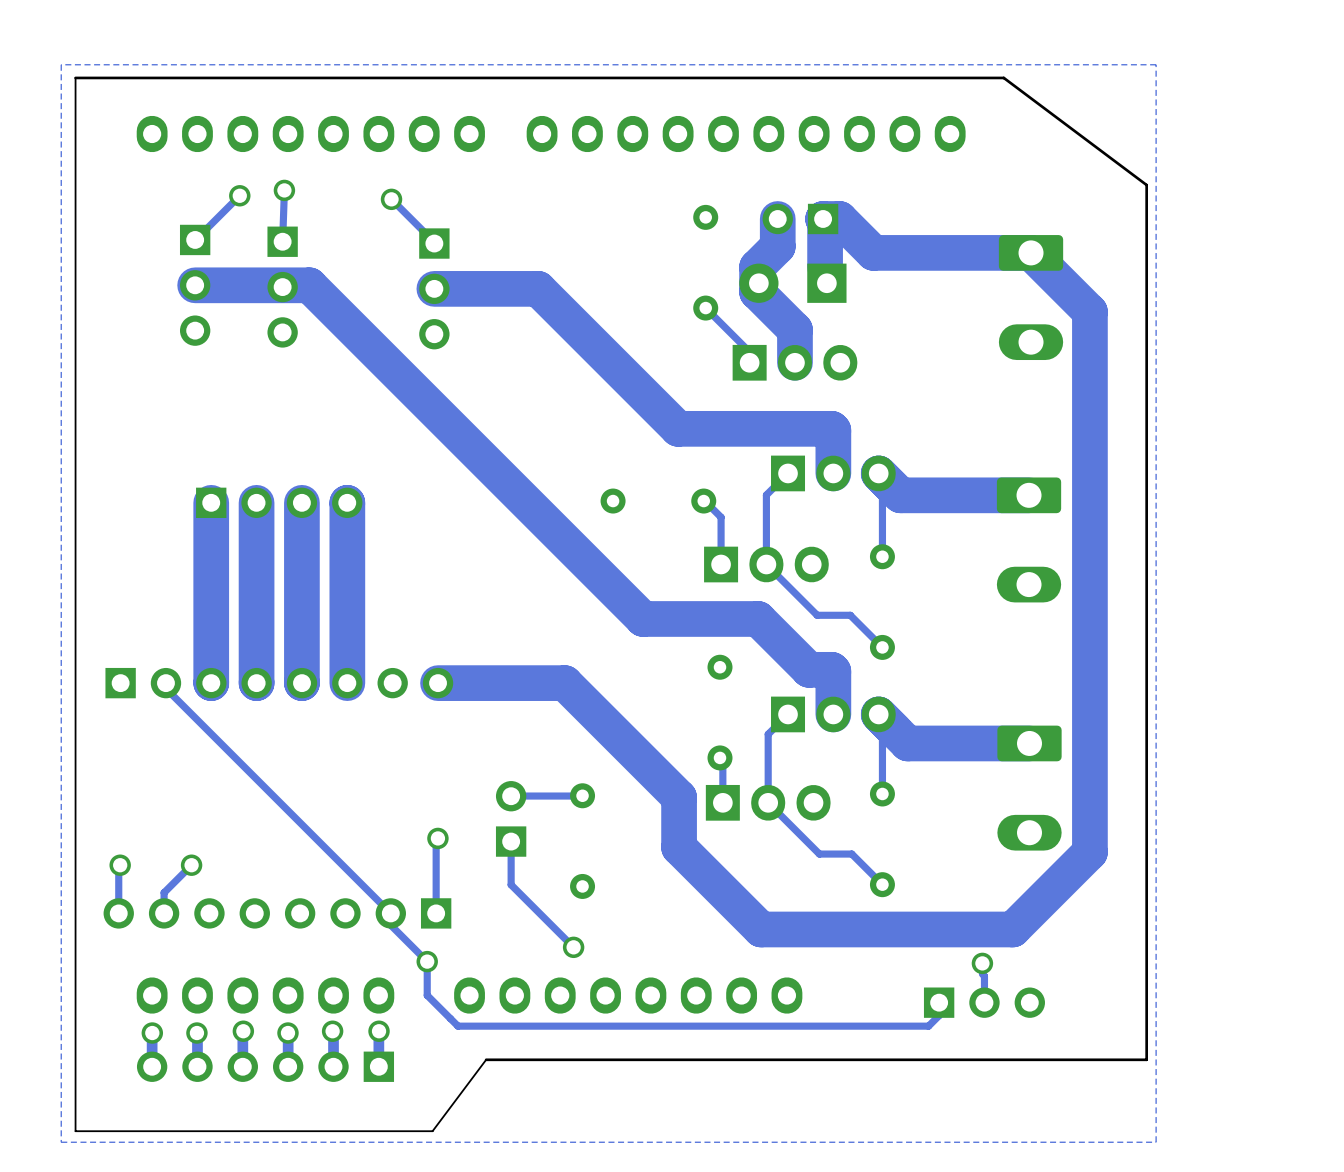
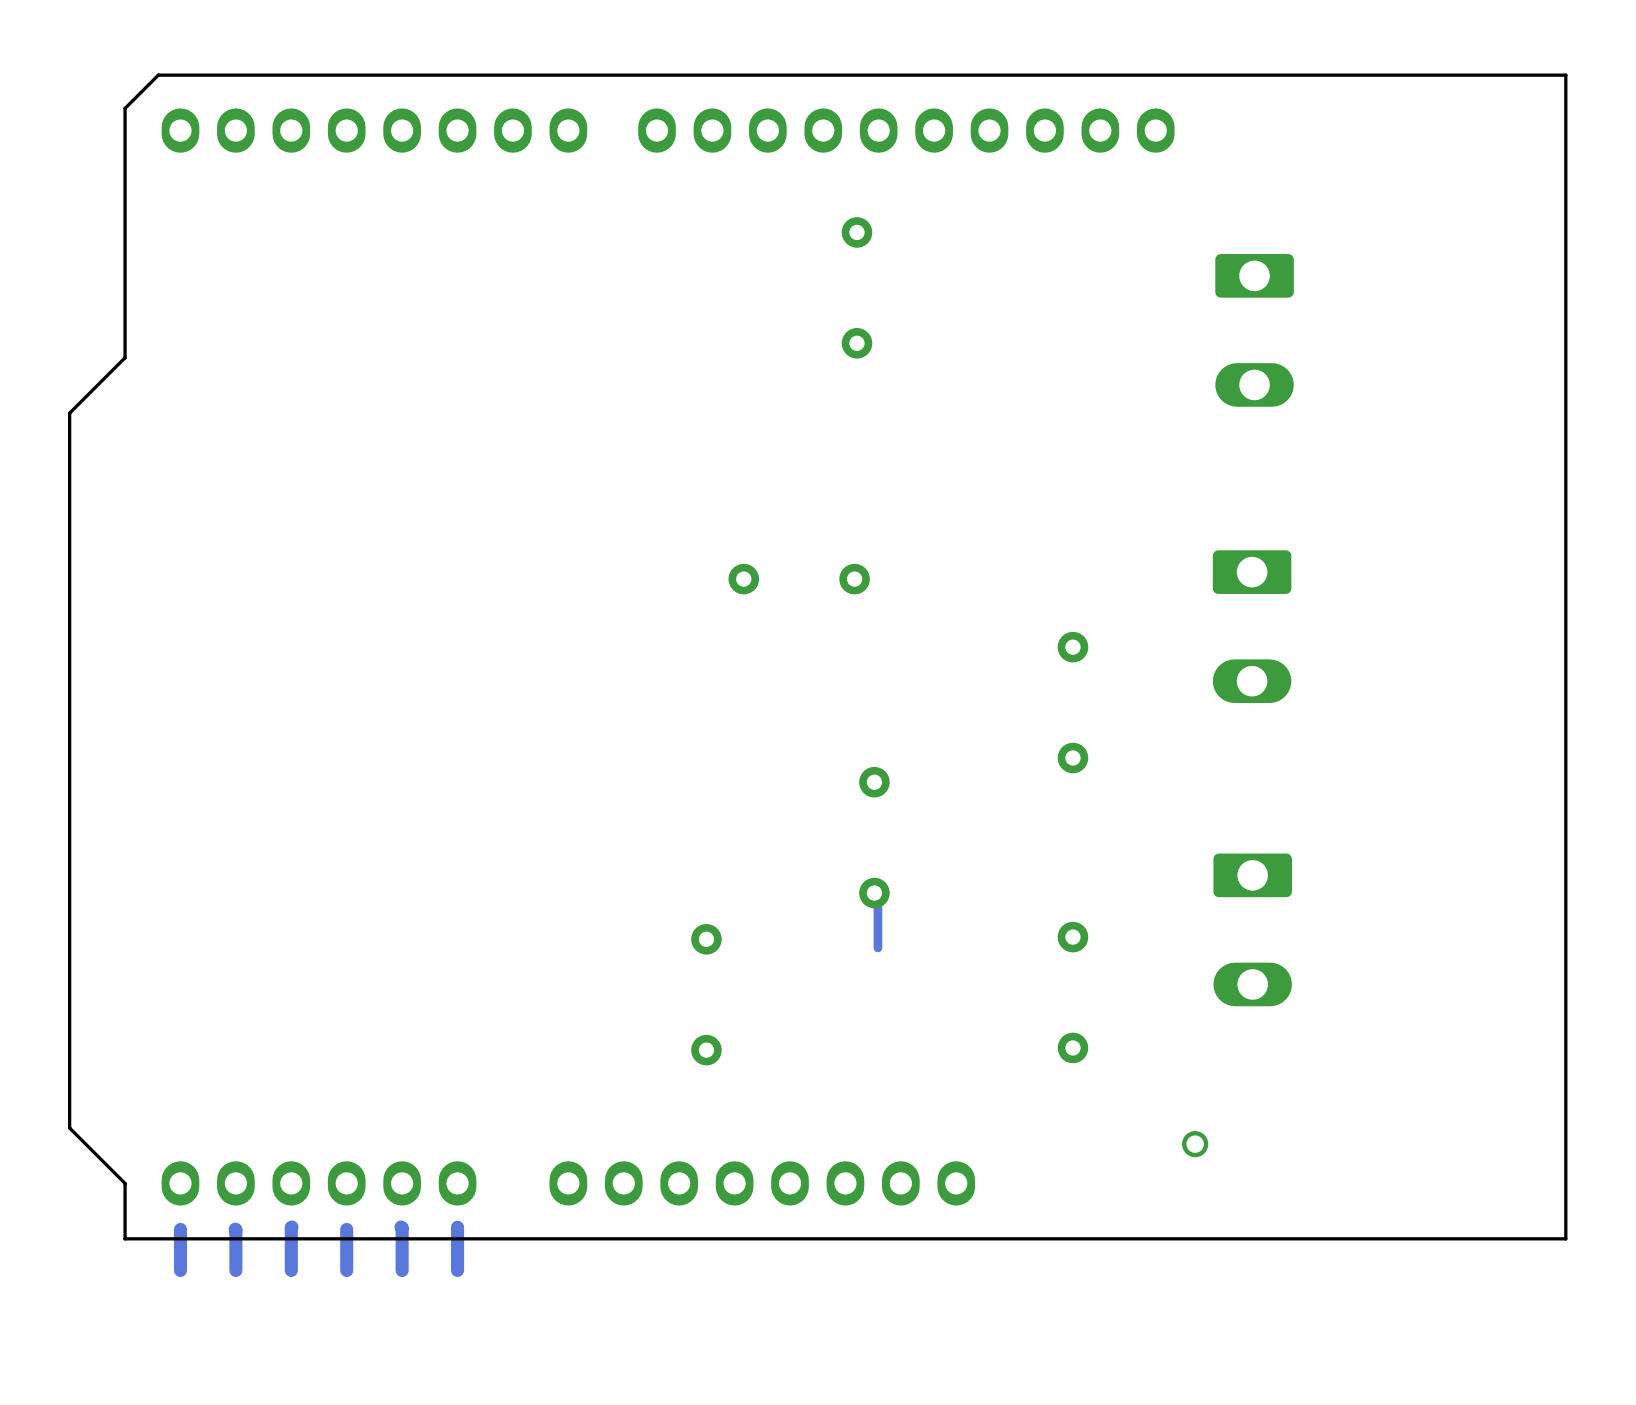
zone outline: (1156, 64) (61, 64) (61, 1142) (1156, 1142) (1156, 64) -> none
board edge: (1003, 77) (1146, 185) (1146, 1059) (486, 1059) (432, 1131) (75, 1131) (75, 77) (1003, 77) -> (1565, 75) (1565, 1238) (125, 1238) (125, 1183) (69, 1128) (69, 413) (125, 357) (125, 108) (158, 75) (1565, 75)
via: (284, 190) -> none
track: (282, 192) (284, 190) (282, 241) -> none
track: (239, 195) (195, 239) -> none
via: (239, 195) -> none
track: (391, 199) (434, 243) -> none
via: (391, 199) -> none
track: (777, 218) (777, 246) (757, 267) (757, 291) (794, 329) (794, 362) -> none
part: (800, 218) -> none
track: (825, 267) (825, 220) (823, 218) (839, 218) (873, 252) (1031, 252) (1089, 311) (1089, 852) (1012, 929) (761, 929) (679, 847) (679, 797) (564, 683) (438, 683) -> none
part: (792, 283) -> none
track: (195, 285) (309, 285) (643, 618) (758, 618) (808, 669) (833, 671) (833, 714) -> none
part: (195, 285) -> none
part: (282, 287) -> none
track: (434, 288) (538, 288) (678, 428) (831, 428) (833, 430) (833, 473) -> none
part: (434, 288) -> none
track: (705, 308) (749, 351) (749, 362) -> none
part: (794, 362) -> none
track: (788, 473) (766, 495) (766, 564) (817, 615) (850, 615) (882, 647) -> none
part: (833, 473) -> none
track: (1029, 495) (900, 495) (878, 473) (882, 477) (882, 556) -> none
track: (704, 501) (721, 517) (721, 564) -> none
track: (211, 502) (211, 683) -> none
track: (256, 502) (256, 683) -> none
part: (279, 502) -> none
track: (301, 502) (301, 683) -> none
track: (347, 502) (347, 683) -> none
part: (766, 564) -> none
track: (165, 683) (165, 688) (390, 913) (390, 925) (427, 961) (427, 995) (457, 1026) (928, 1026) (939, 1015) (939, 1002) -> none
part: (279, 683) -> none
track: (788, 714) (768, 734) (768, 802) (819, 854) (851, 854) (882, 884) -> none
part: (833, 714) -> none
track: (1029, 743) (907, 743) (878, 714) (882, 718) (882, 793) -> none
track: (582, 796) (511, 796) -> none
part: (768, 802) -> none
part: (511, 818) -> none
track: (437, 838) (436, 840) (436, 913) -> none
via: (437, 838) -> none
track: (511, 841) (511, 884) (573, 947) -> none
via: (120, 865) -> none
track: (121, 865) (118, 868) (118, 913) -> none
track: (191, 865) (164, 892) (164, 913) -> none
via: (191, 865) -> none
part: (277, 913) -> none
via: (573, 947) -> none
via: (427, 961) -> none
track: (982, 974) (984, 976) (984, 1002) -> none
part: (984, 1002) -> none
via: (243, 1031) -> none
via: (332, 1031) -> none
via: (379, 1031) -> none
via: (152, 1033) -> none
via: (196, 1033) -> none
via: (287, 1033) -> none
part: (265, 1066) -> none

